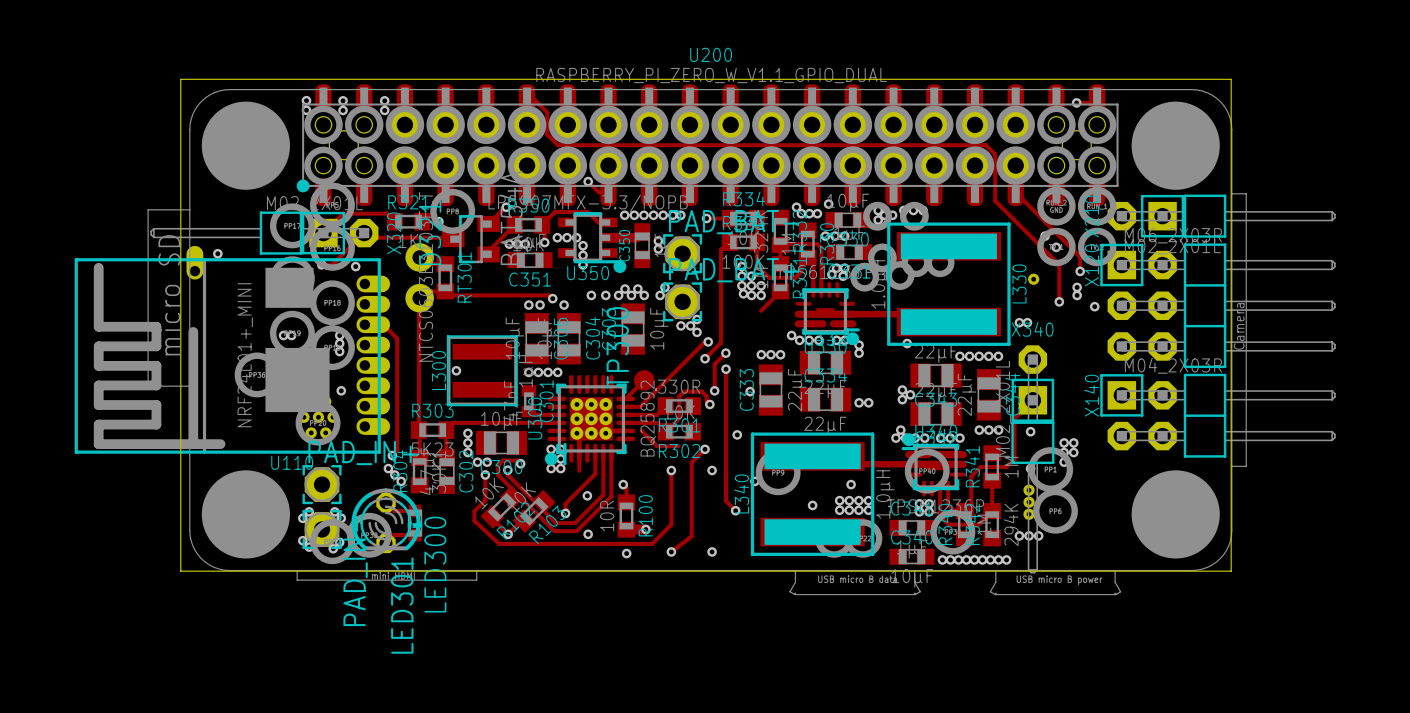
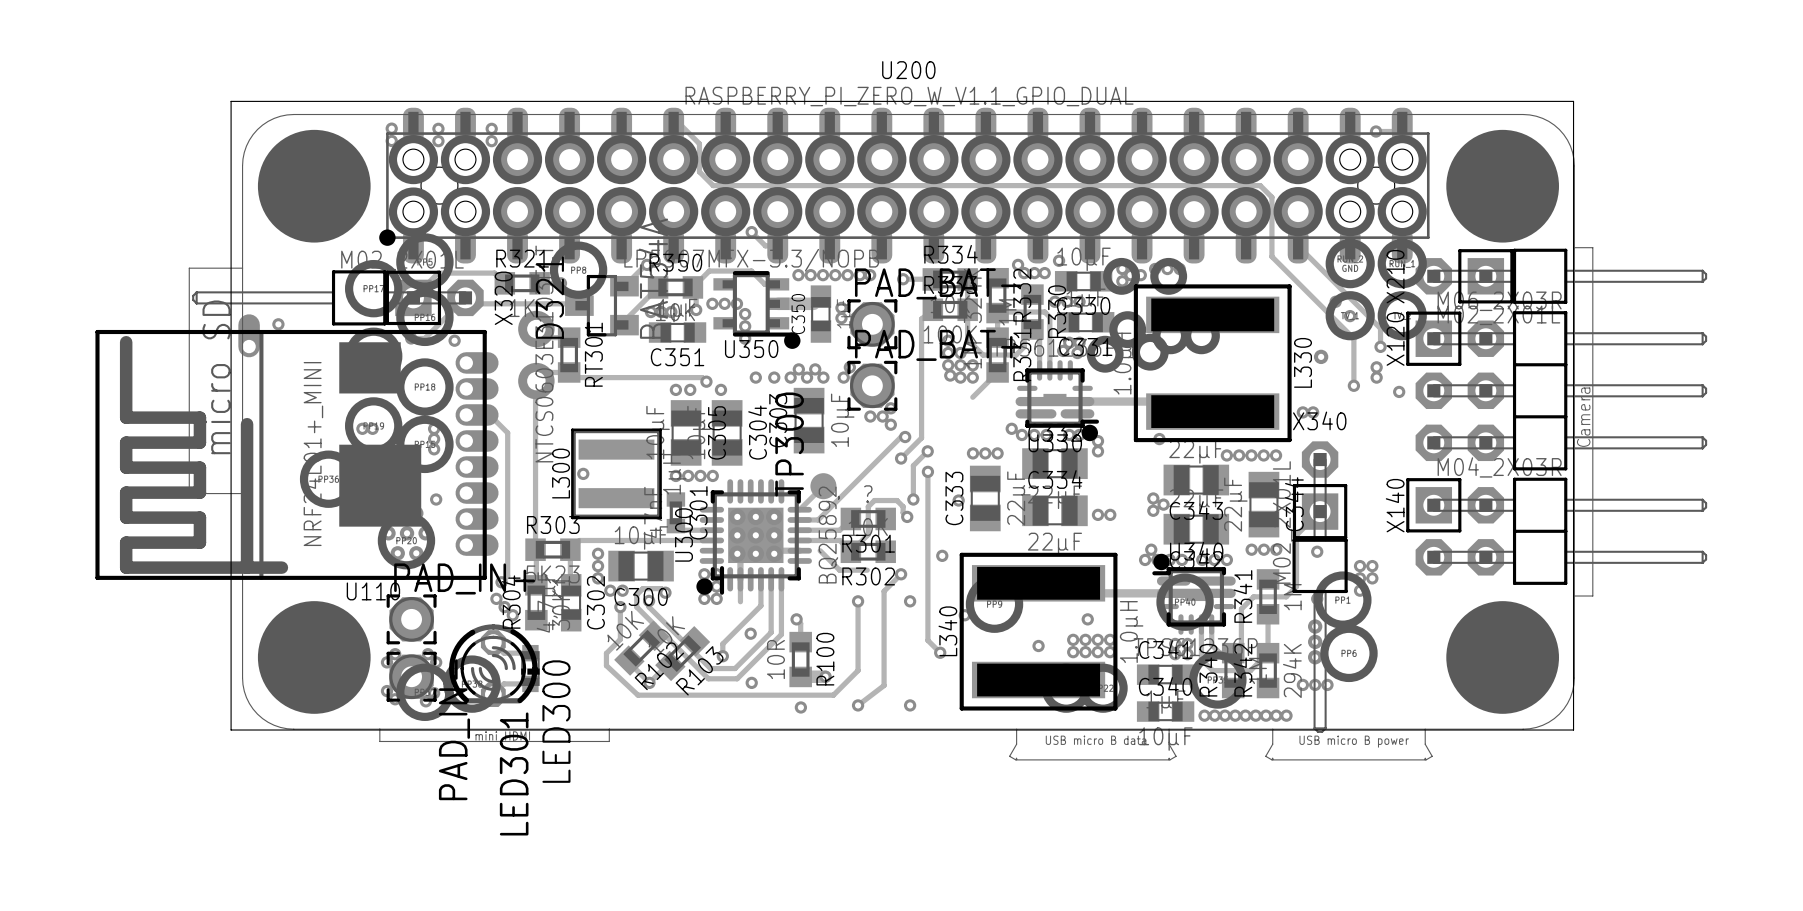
R301 value: 330R (679, 386) -> ? (868, 494)

